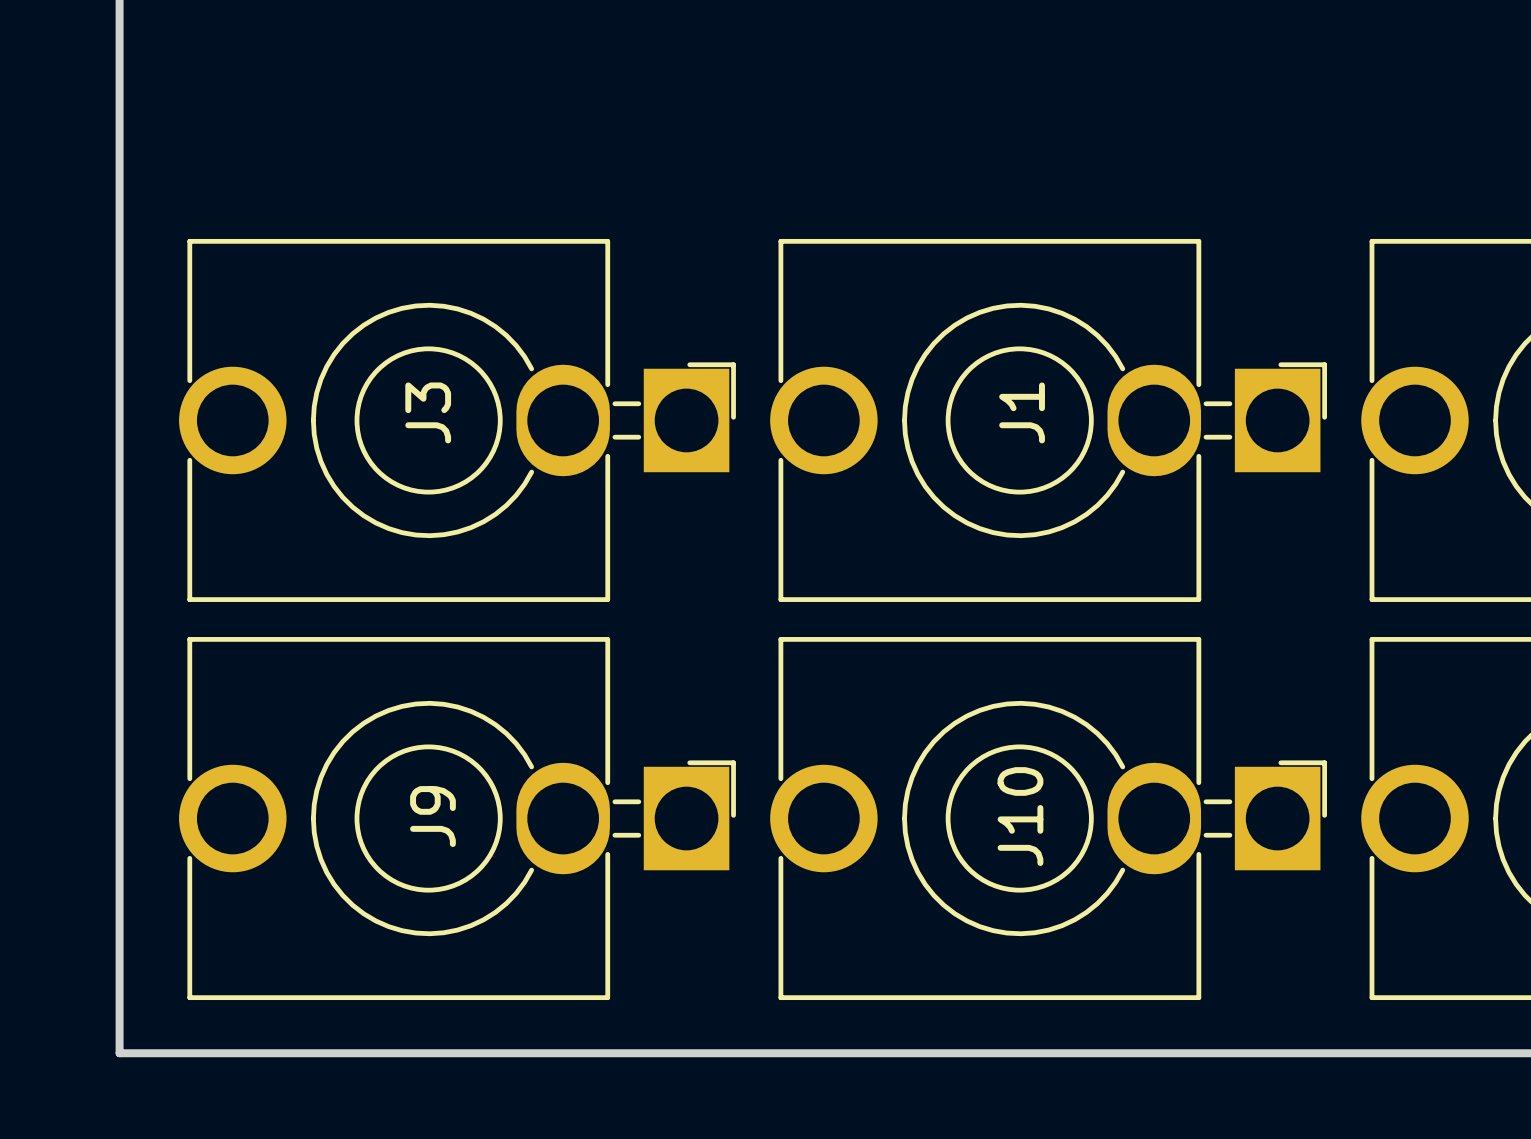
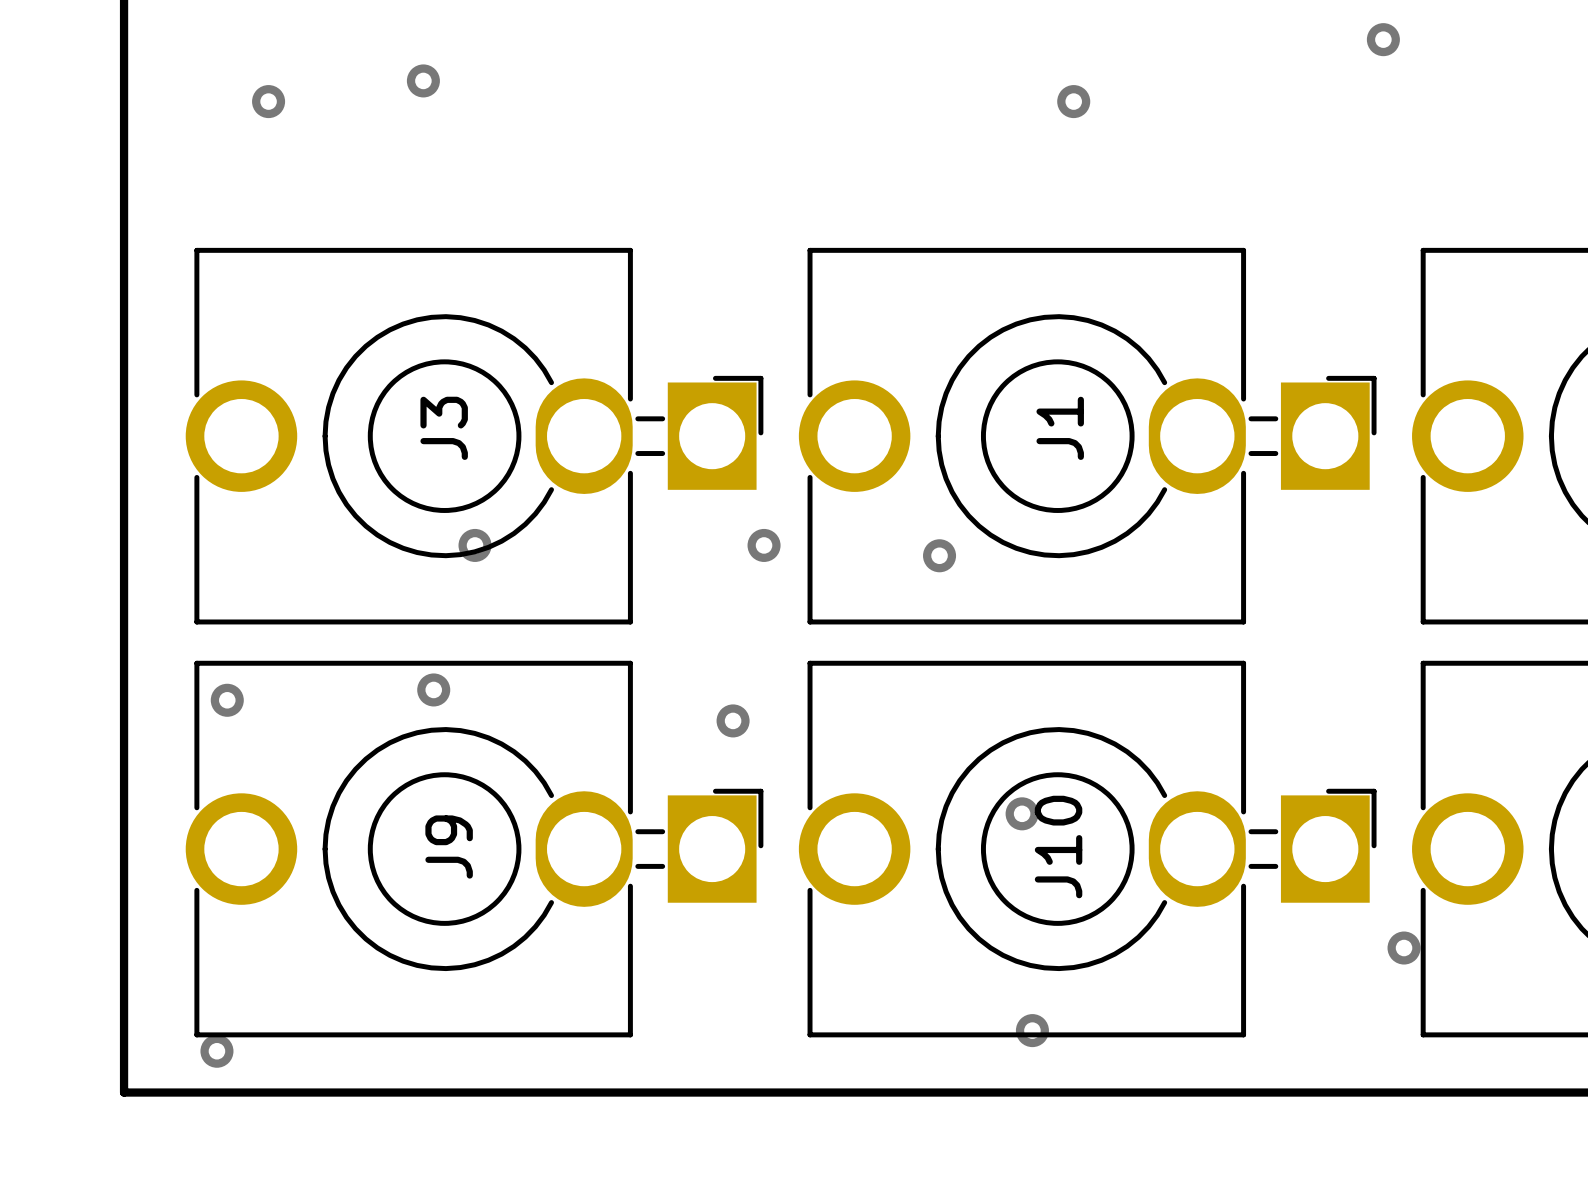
via: none -> (1383, 39)
via: none -> (423, 80)
via: none -> (268, 101)
via: none -> (1073, 101)
via: none -> (475, 545)
via: none -> (764, 545)
via: none -> (939, 555)
via: none -> (433, 689)
via: none -> (227, 700)
via: none -> (733, 720)
via: none -> (1022, 813)
via: none -> (1404, 948)
via: none -> (1032, 1030)
via: none -> (216, 1051)

